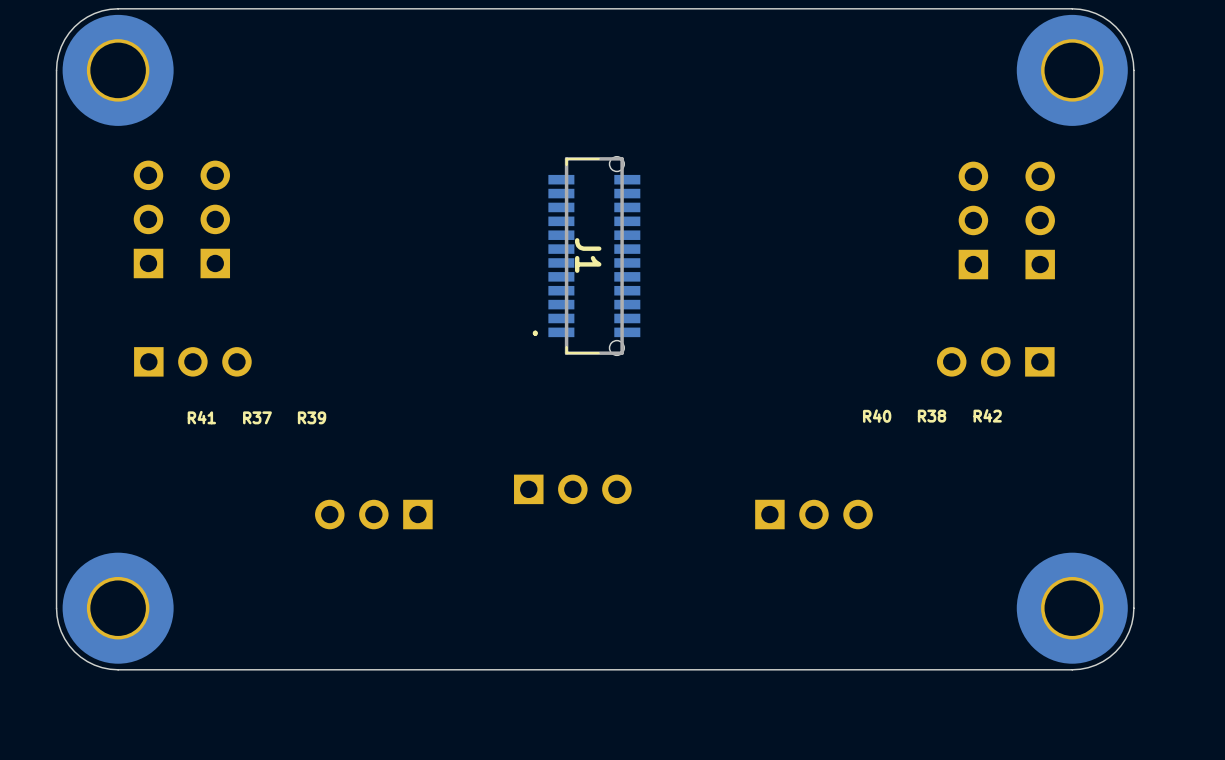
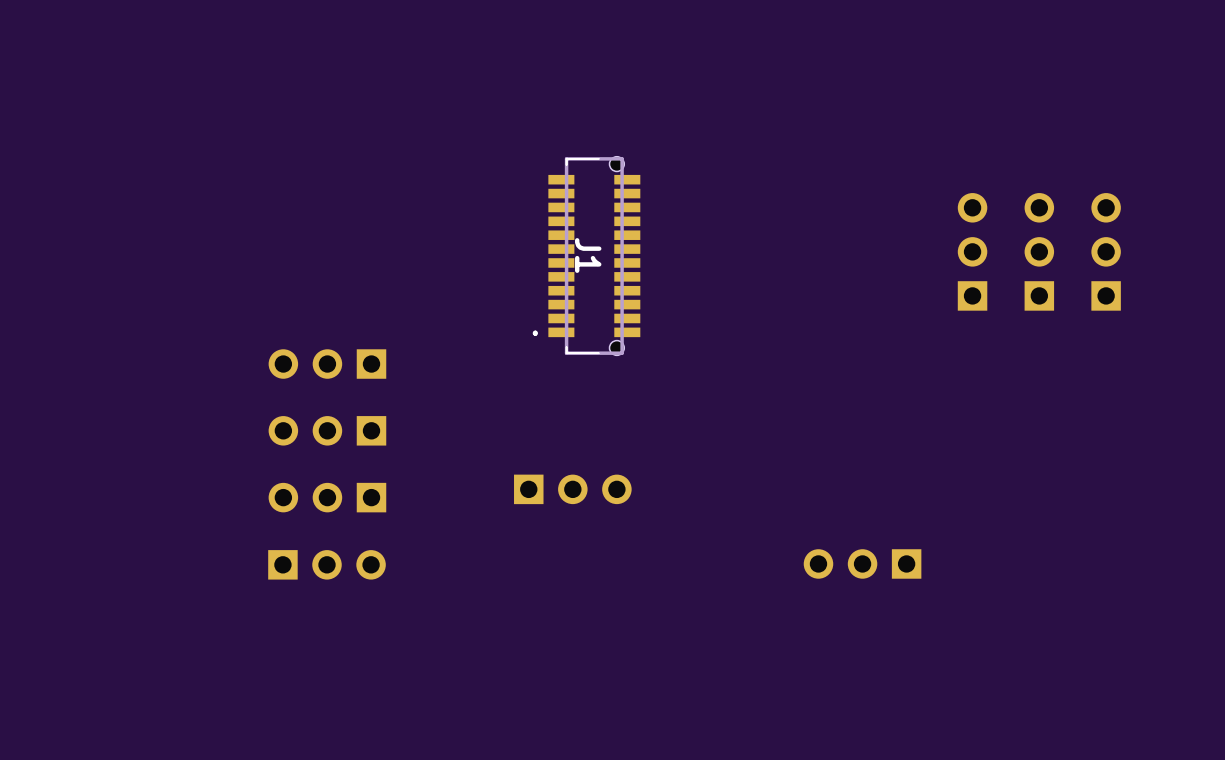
board edge: (1072, 8) (118, 8) (102, 10) (87, 17) (74, 26) (64, 39) (58, 54) (56, 70) (56, 608) (58, 624) (64, 639) (74, 651) (87, 661) (102, 667) (118, 669) (1072, 669) (1088, 667) (1103, 661) (1115, 651) (1125, 639) (1131, 624) (1133, 608) (1133, 70) (1129, 46) (1115, 26) (1095, 13) (1072, 8) -> none
part: (118, 70) -> none
part: (1072, 70) -> none
part: (148, 219) -> none
part: (215, 219) -> none
part position: (973, 220) -> (972, 251)
part position: (1040, 220) -> (1039, 251)
part: none -> (1106, 251)
part: (192, 361) -> none
part: (995, 361) -> none
part: none -> (327, 364)
R42: (987, 415) -> none
R40: (877, 416) -> none
R38: (932, 416) -> none
R41: (201, 417) -> none
R37: (257, 417) -> none
R39: (312, 417) -> none
part: none -> (327, 430)
part: none -> (327, 497)
part: (373, 514) -> none
part rotation: 0° (813, 514) -> 180° (862, 563)
part: none -> (327, 564)
part: (118, 608) -> none
part: (1072, 608) -> none

